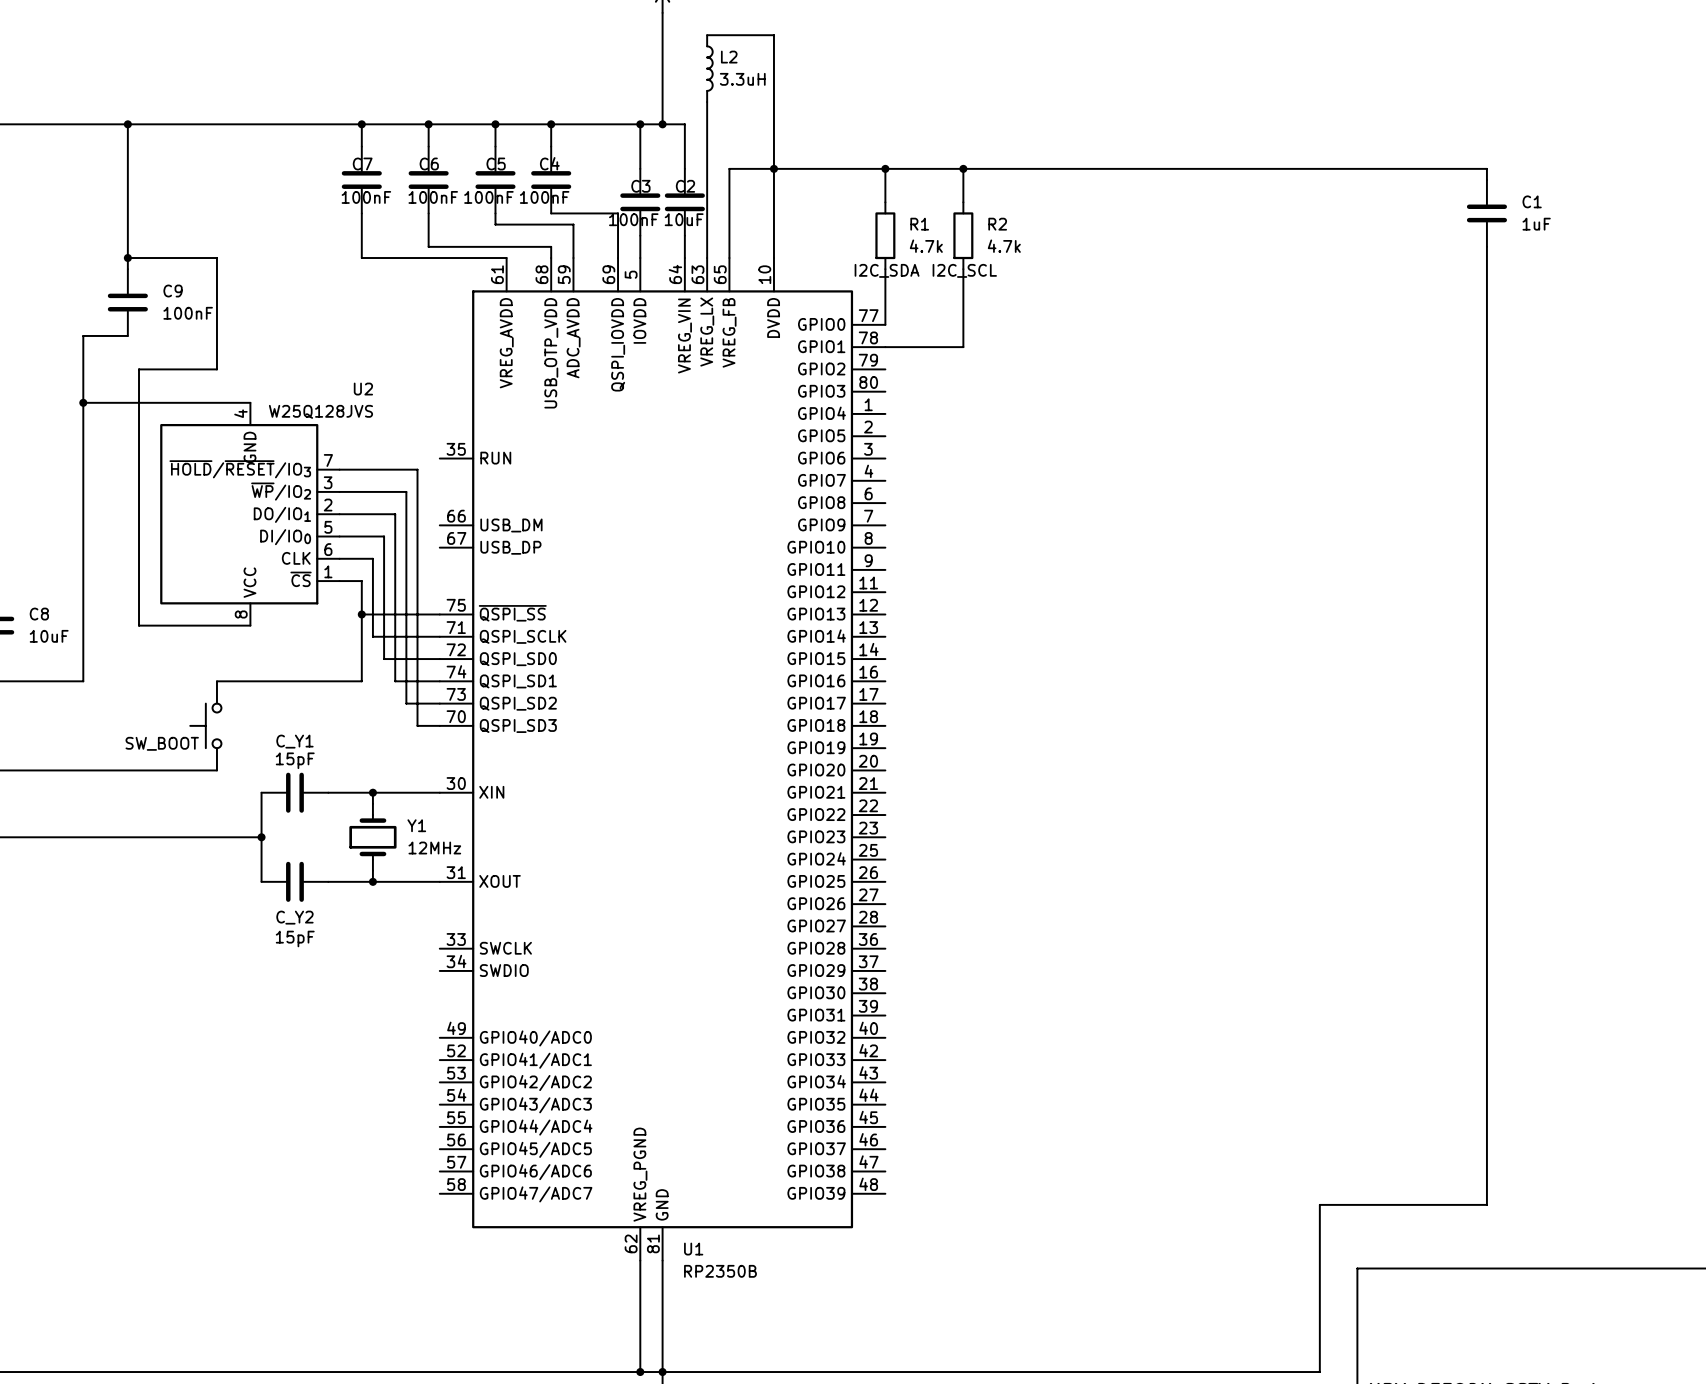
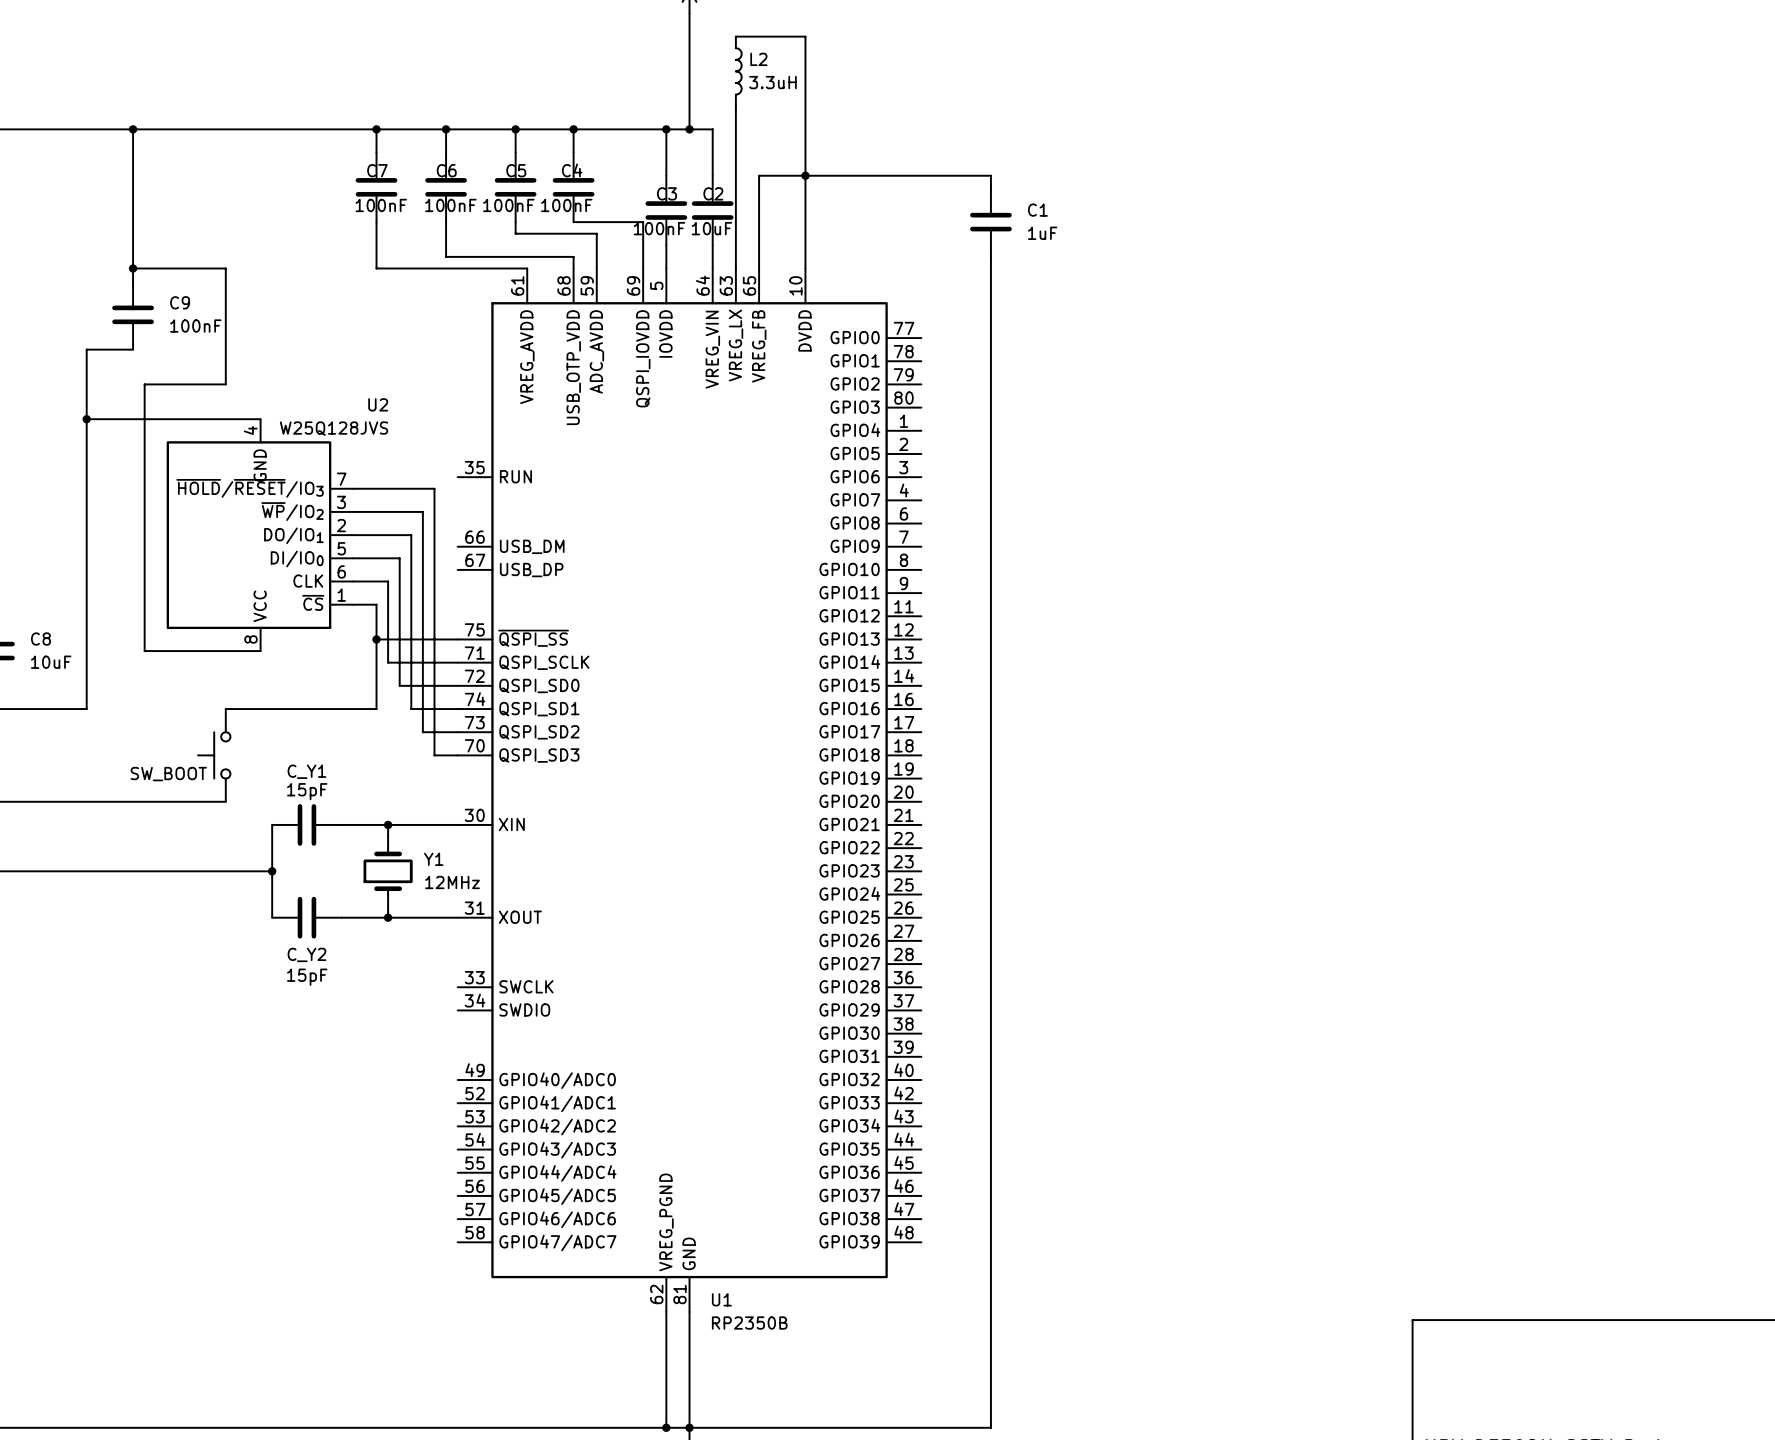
wire: (885, 168) (885, 202) -> none
junction: (885, 168) -> none
wire: (952, 168) (1486, 168) (1486, 180) -> (990, 175) (990, 187)
wire: (963, 168) (963, 202) -> none
junction: (963, 168) -> none
C1 position: (1486, 213) -> (990, 222)
R1: 4.7k (885, 235) -> none
R2: 4.7k (963, 235) -> none
wire: (1486, 246) (1486, 1204) (1319, 1204) (1319, 1372) (952, 1372) -> (990, 256) (990, 1427)
wire: (885, 269) (885, 324) -> none
wire: (963, 269) (963, 347) (885, 347) -> none
label: I2C_SDA (887, 270) -> none
label: I2C_SCL (964, 270) -> none

